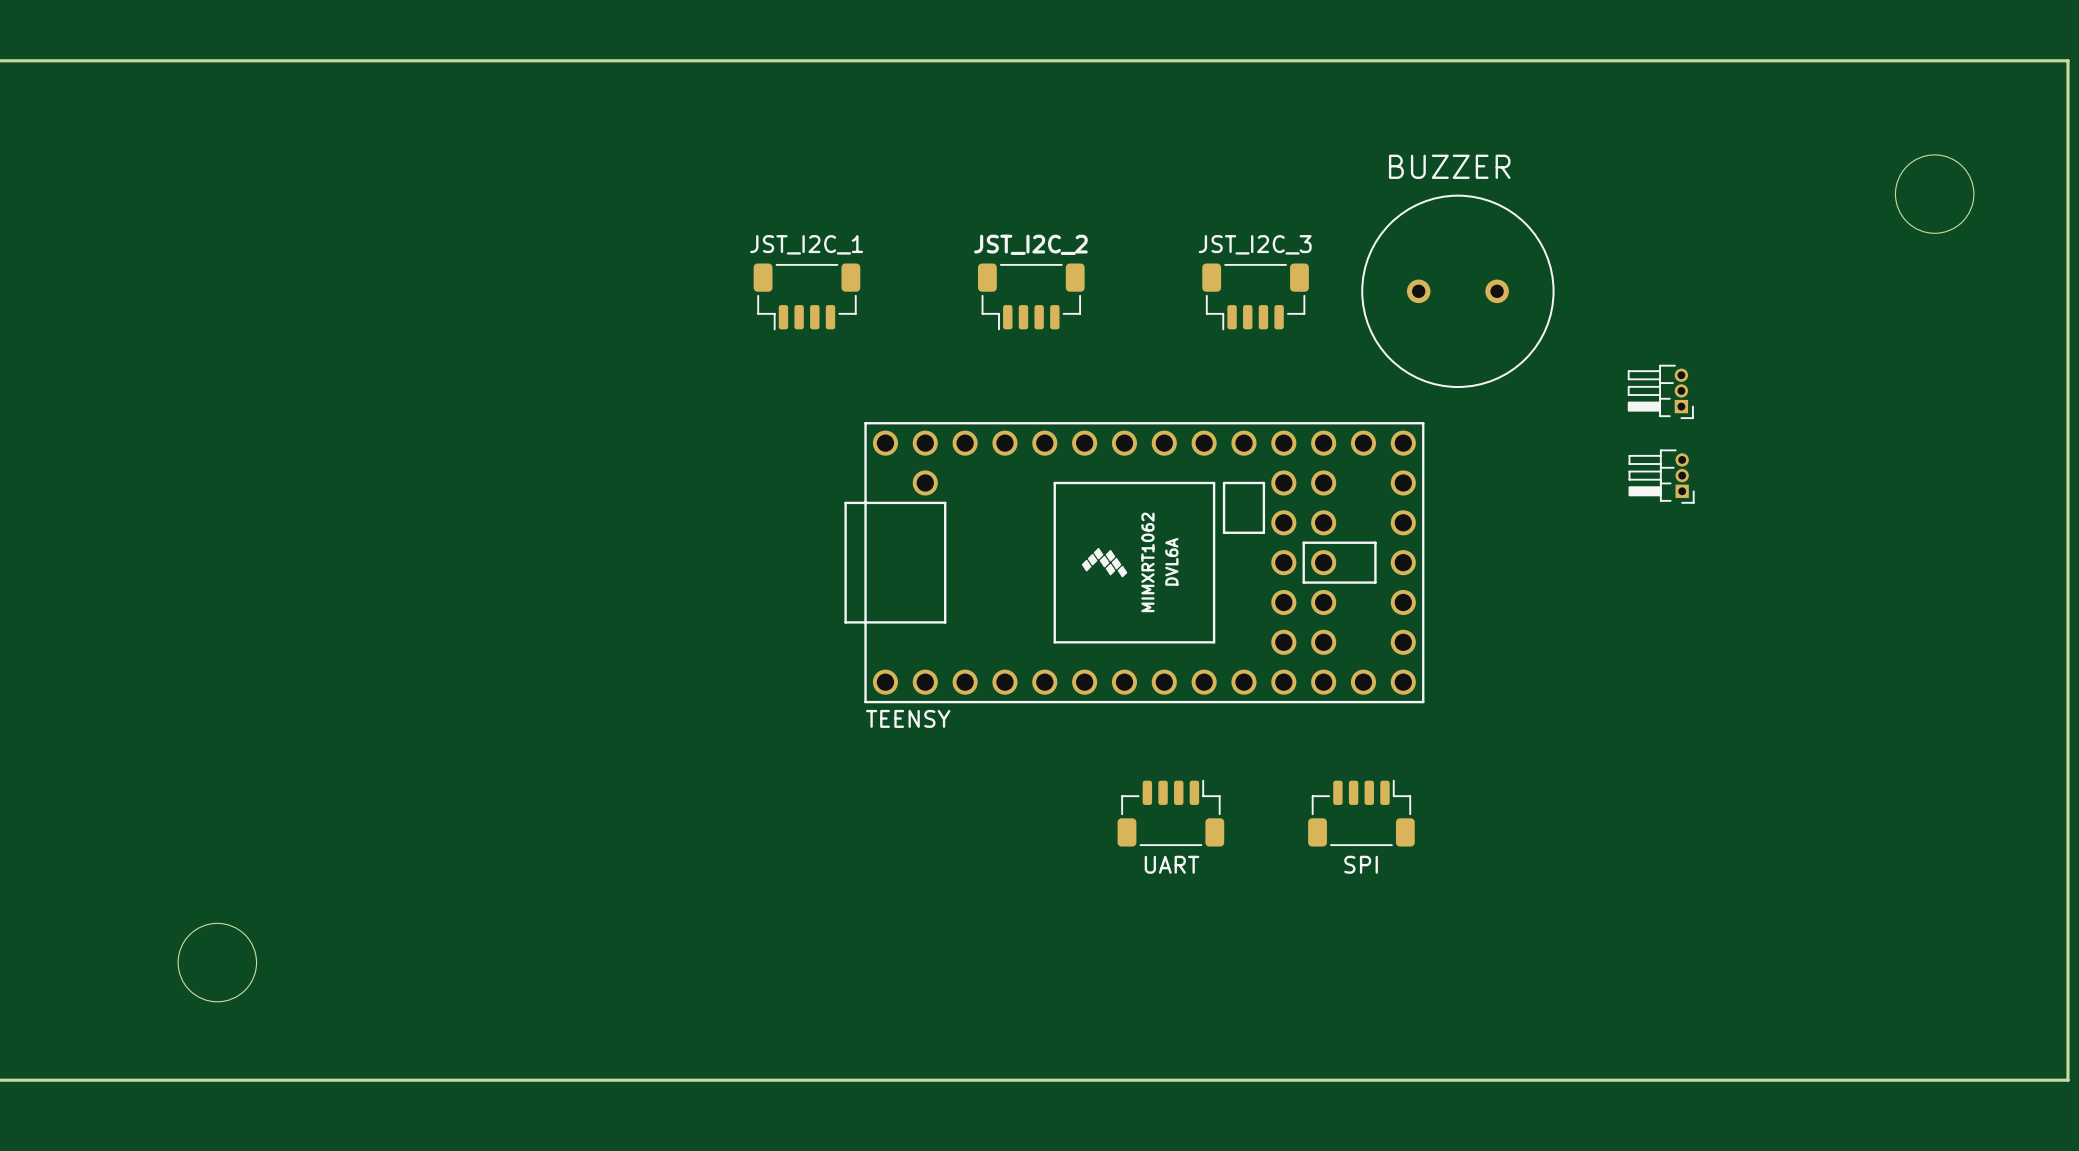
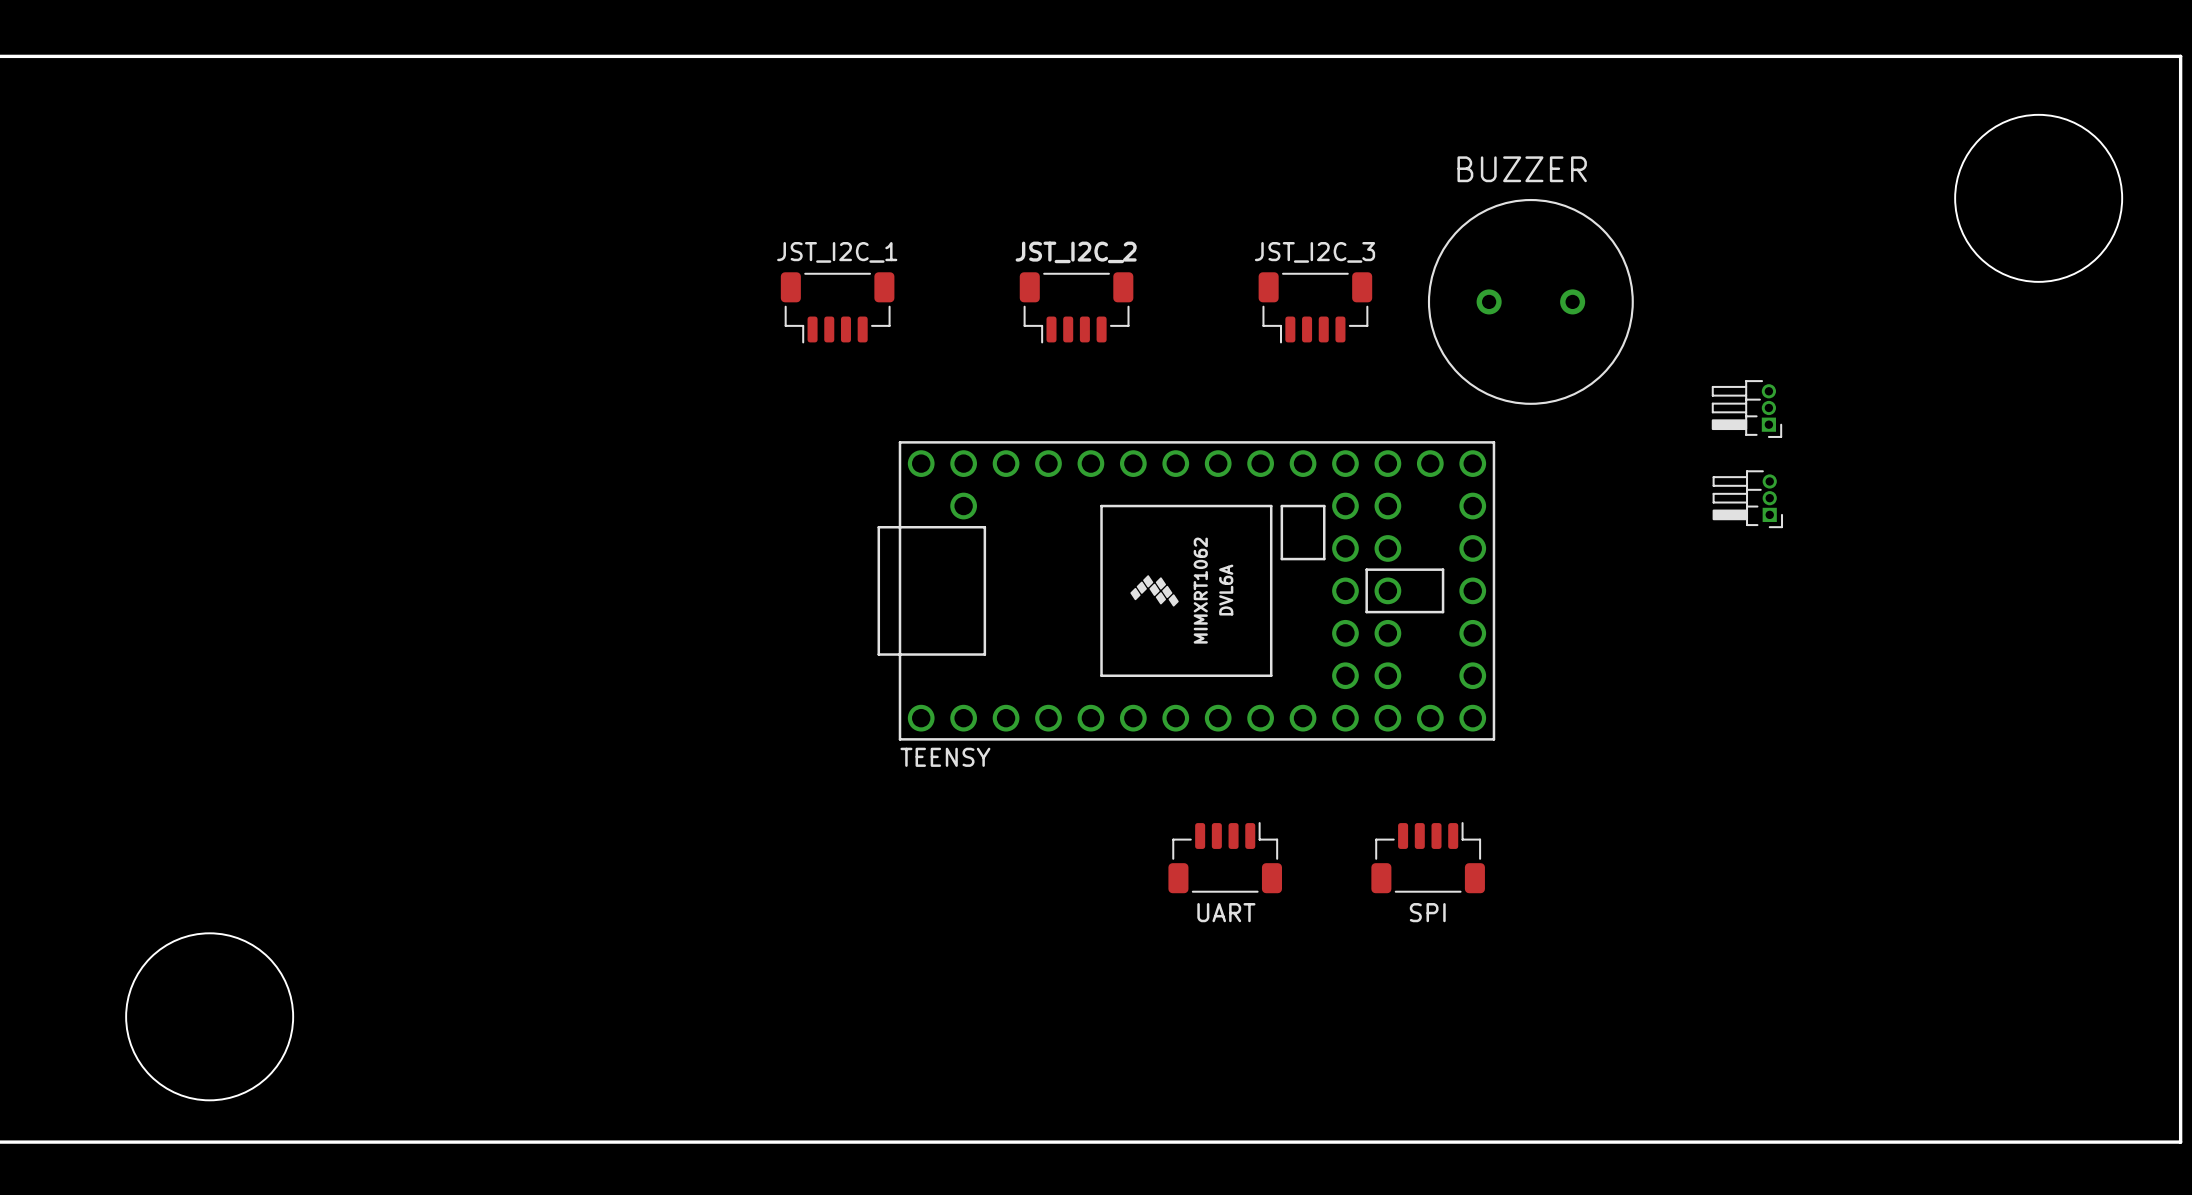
round board edge size: [1895, 154, 1975, 234] -> [1954, 114, 2123, 283]
round board edge size: [177, 922, 257, 1003] -> [125, 932, 294, 1101]

